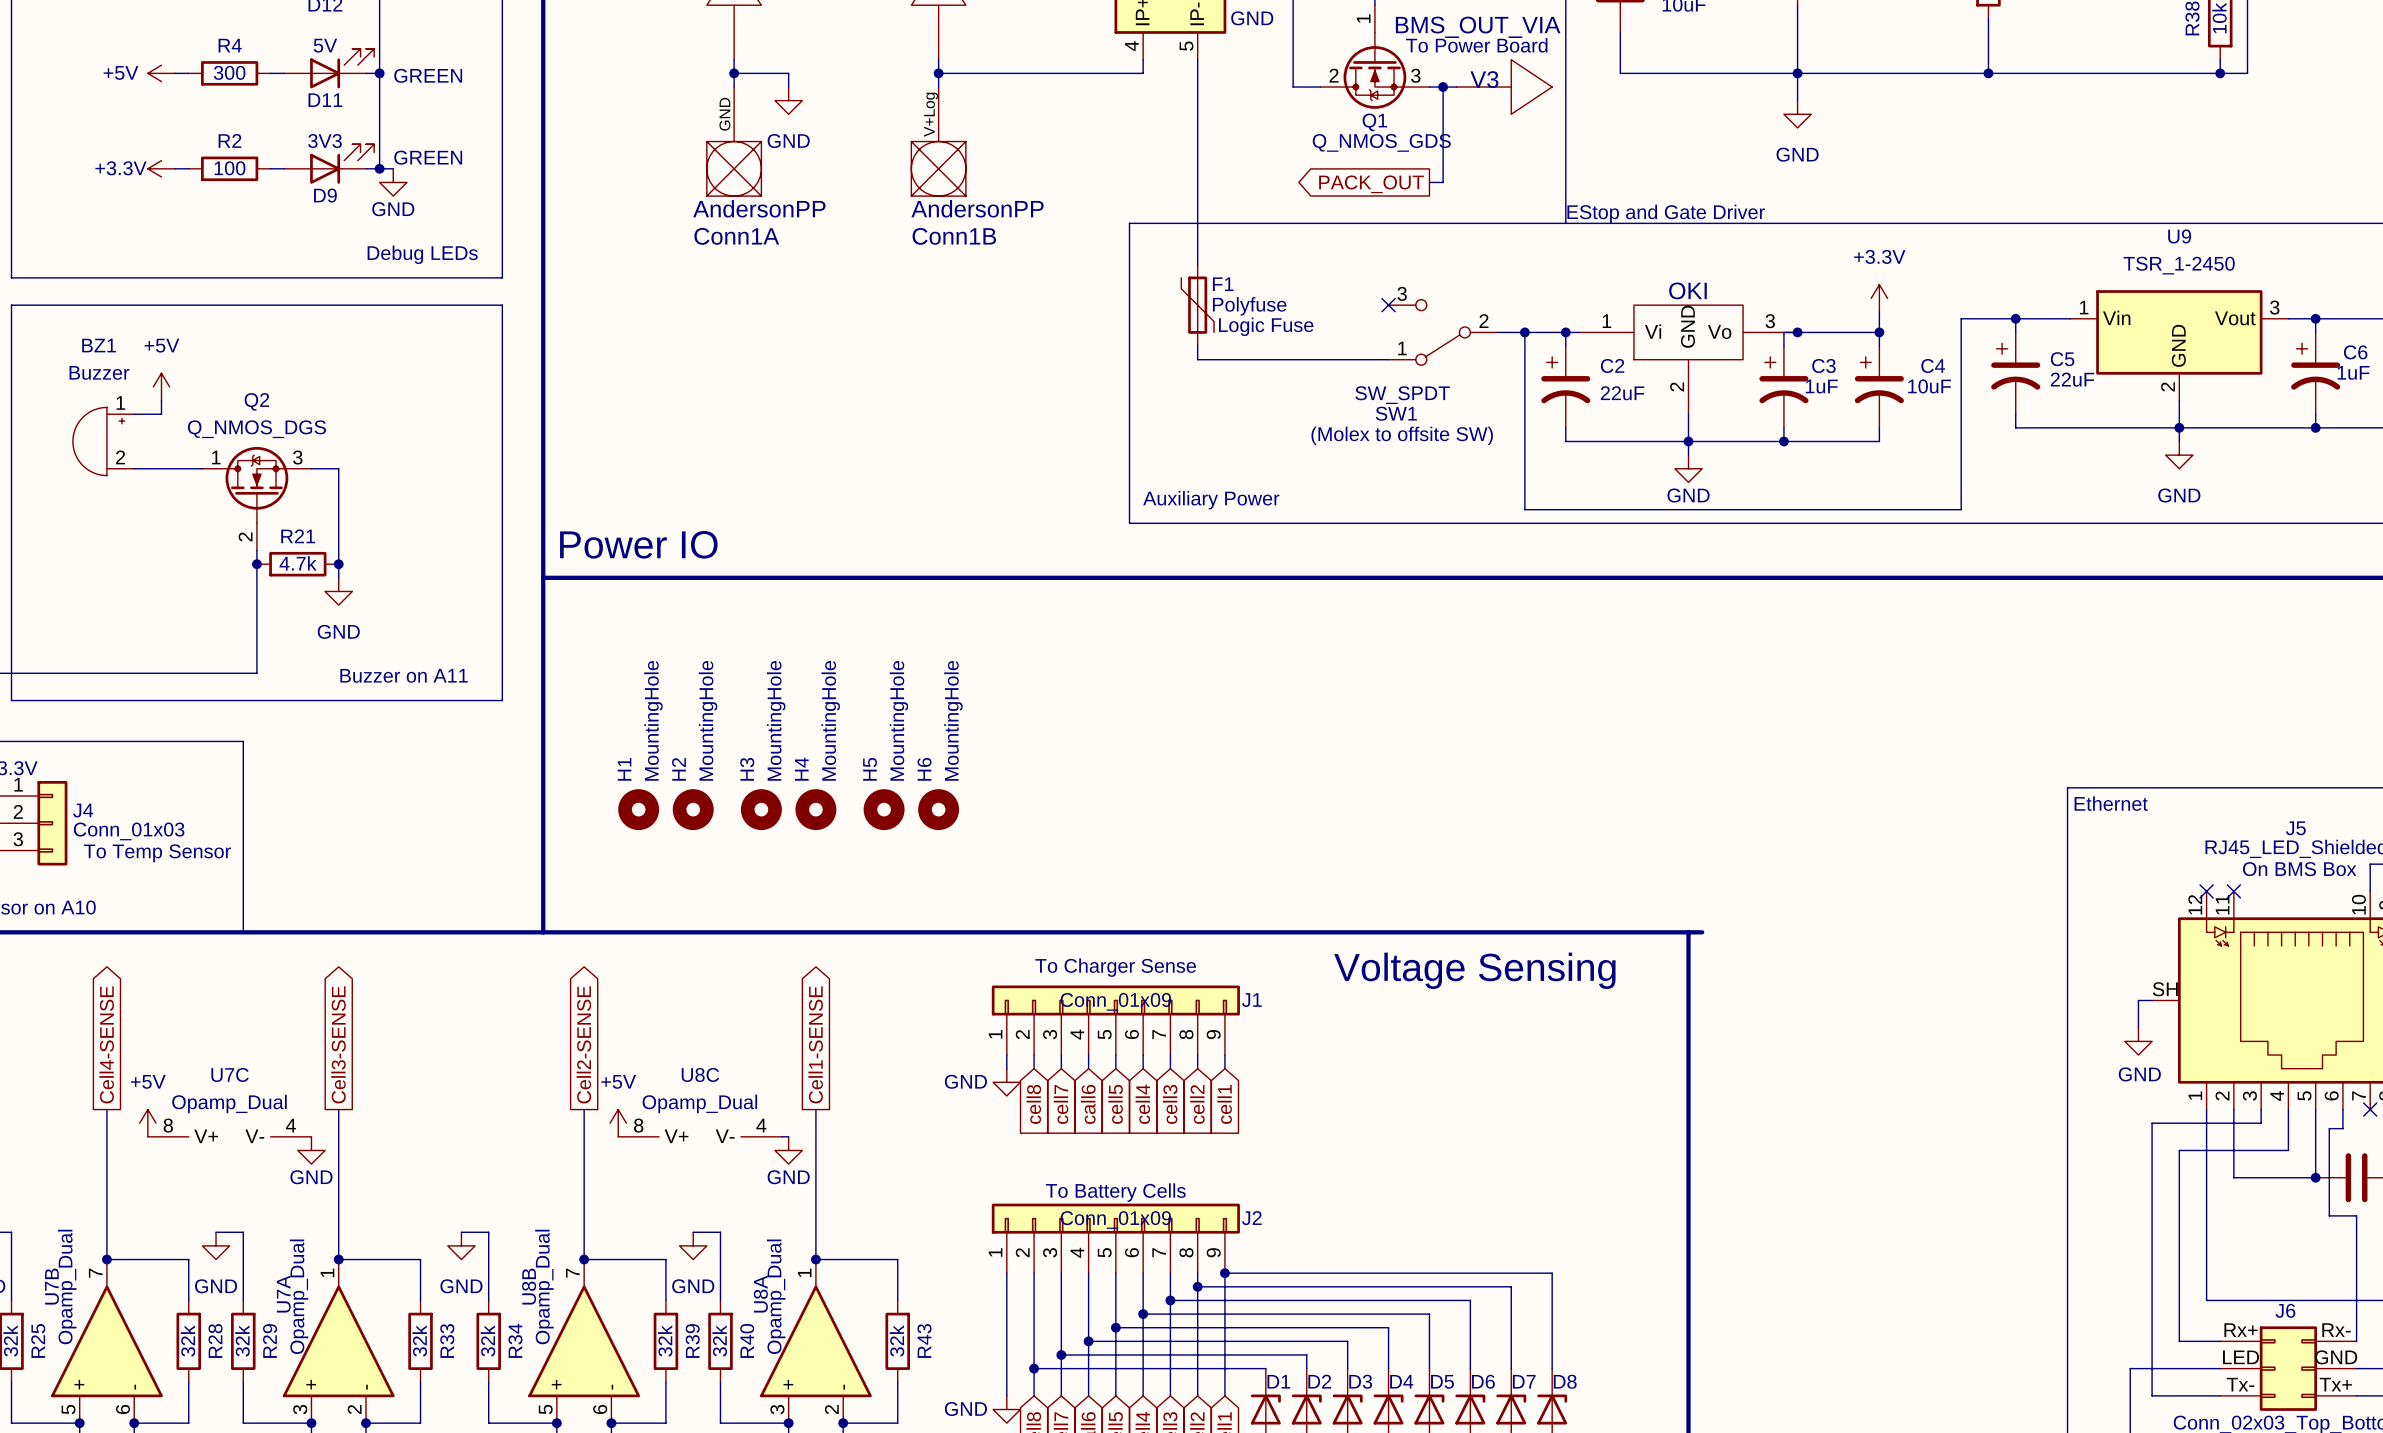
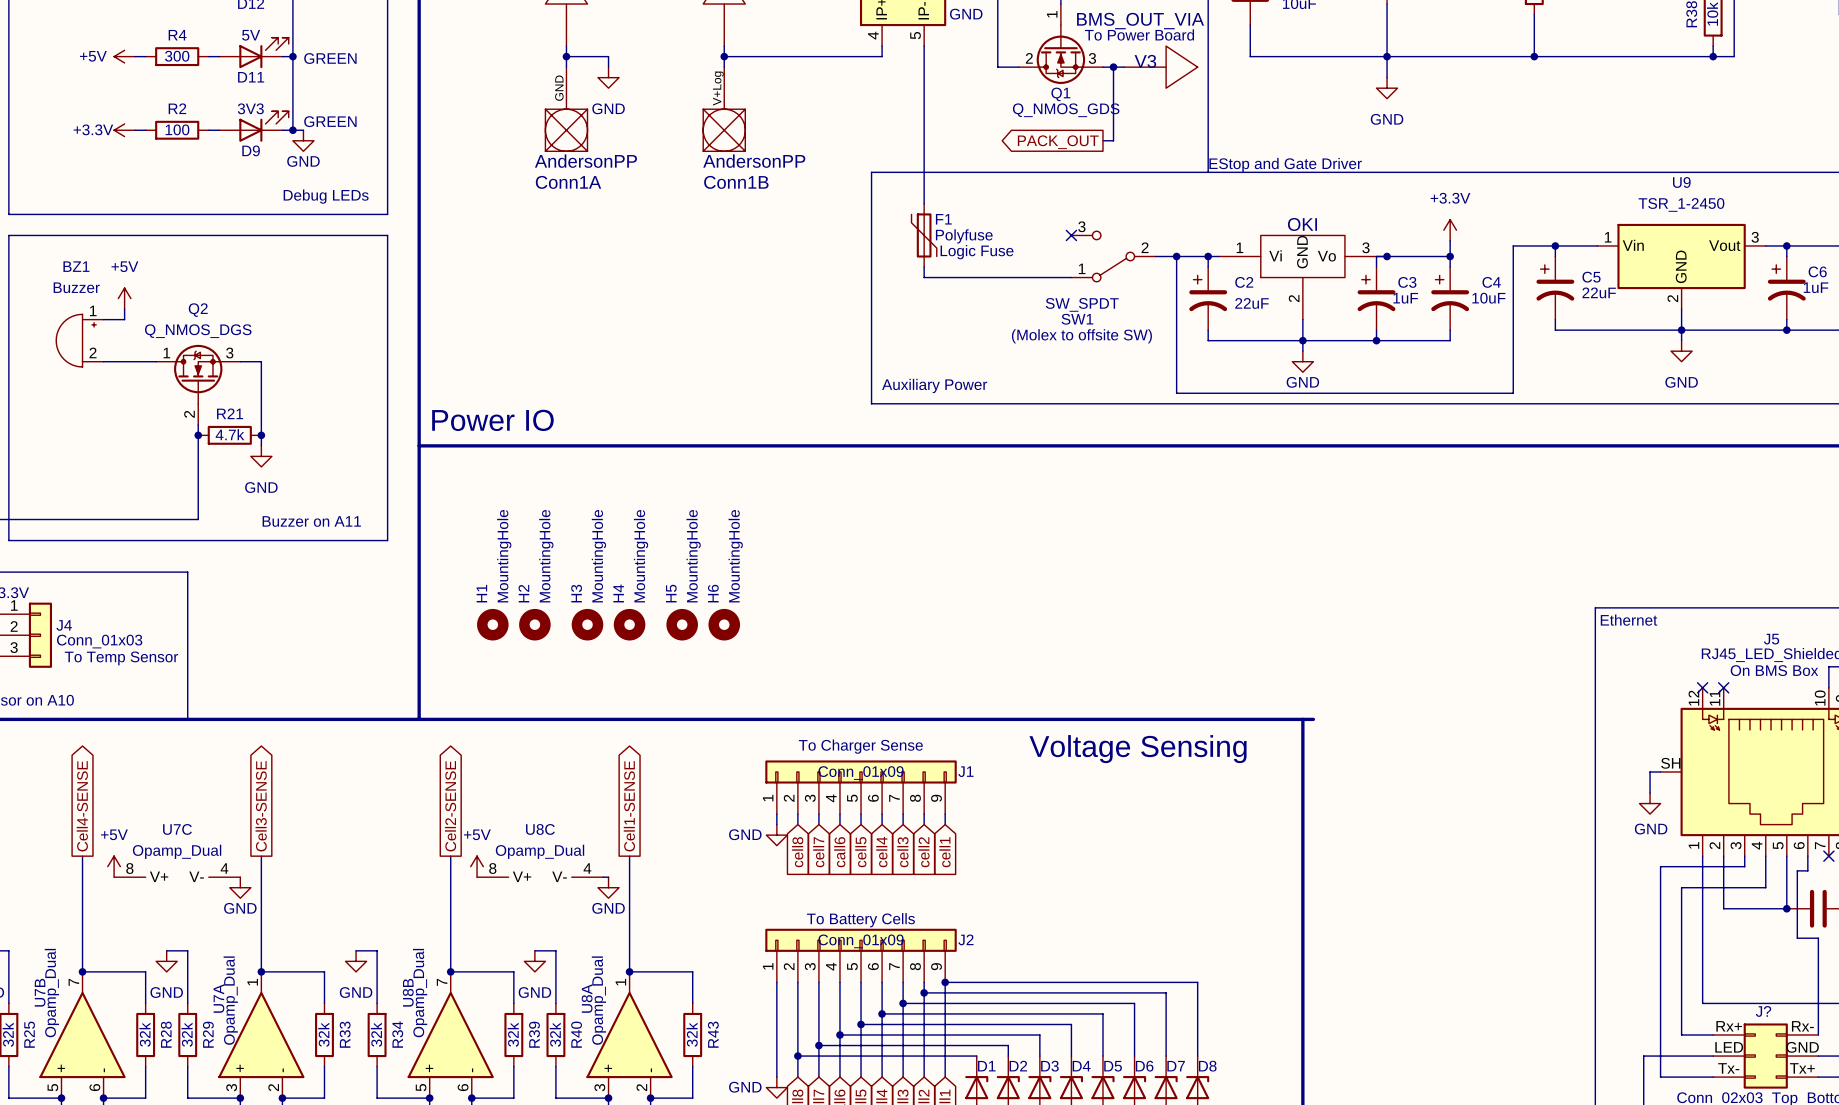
J6 name: J6 (2285, 1310) -> J? (1763, 1011)

